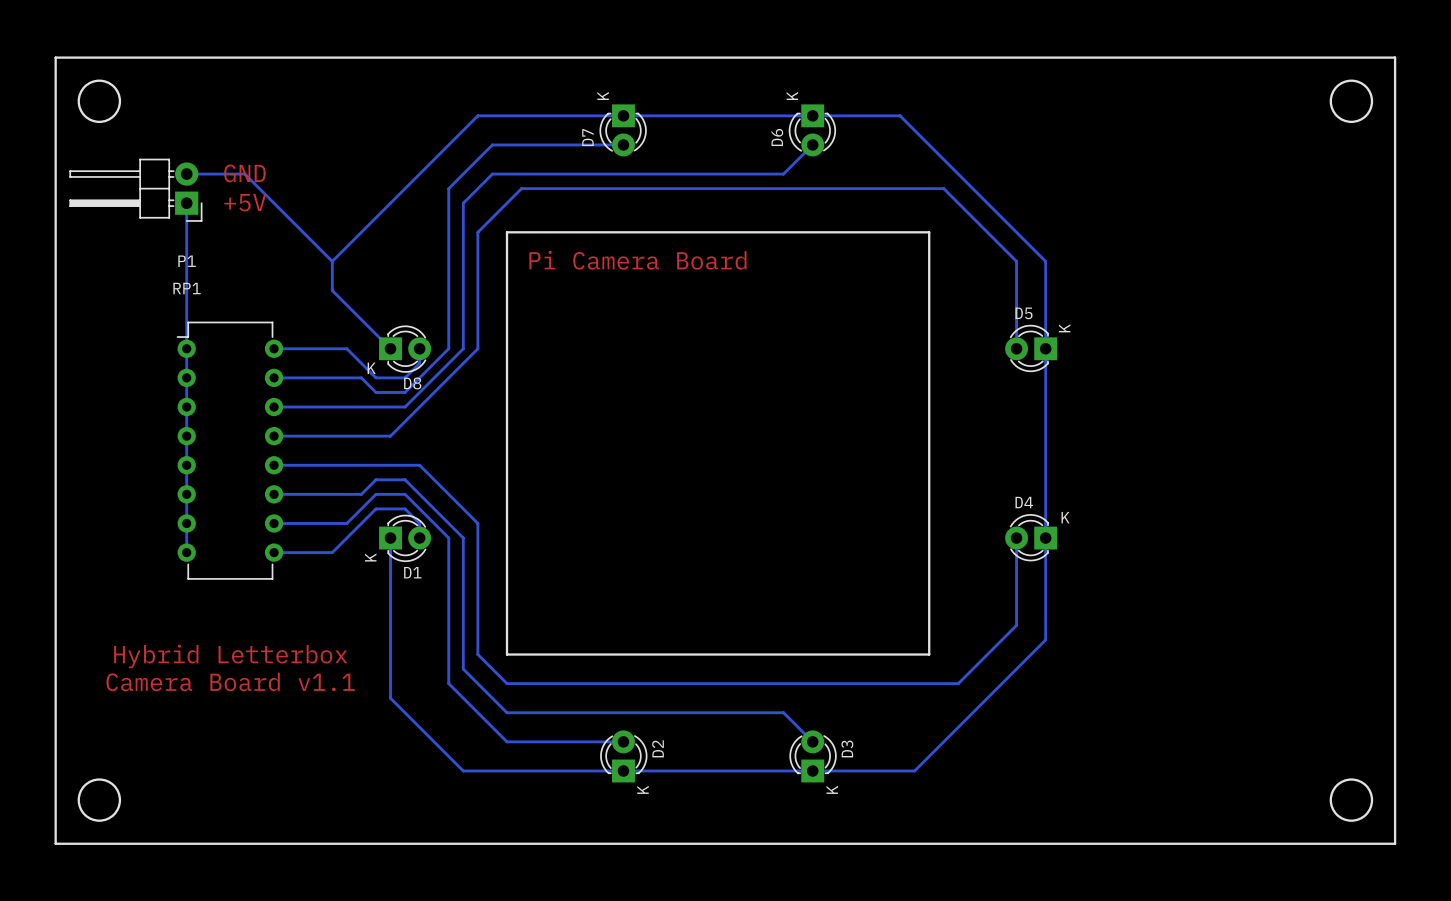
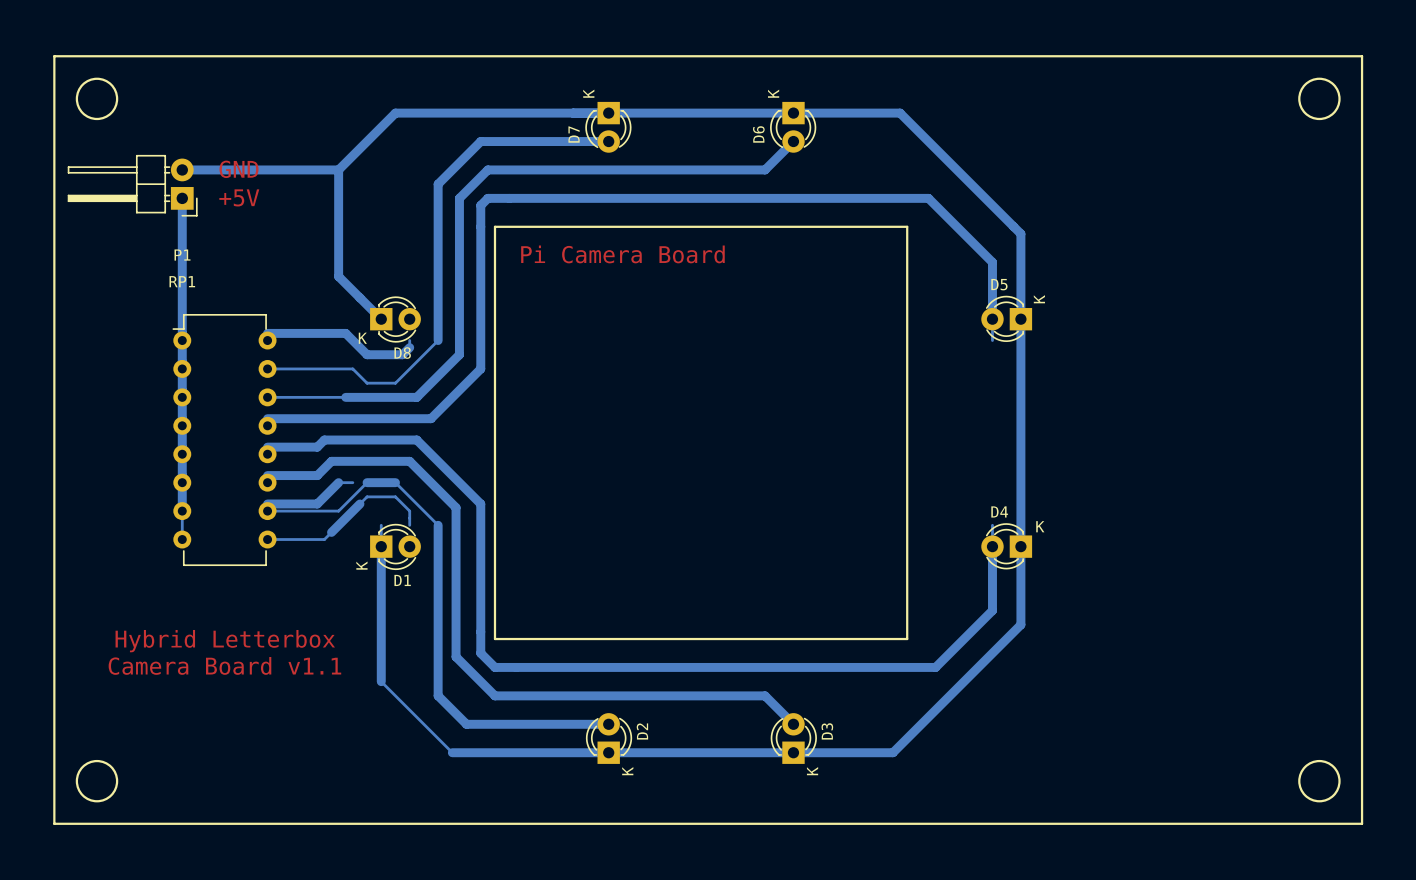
bottom track: (477, 115) (332, 261) -> (466, 113) (395, 113) (338, 169)
bottom track width: thin (477, 115) (900, 115) -> thick (466, 113) (878, 113)
bottom track: (900, 115) (1045, 261) -> (878, 113) (900, 113) (1020, 233) (1020, 255)
bottom track width: thin (623, 144) (492, 144) (448, 188) (448, 348) -> thick (608, 141) (480, 141) (438, 184) (438, 340)
bottom track width: thin (812, 144) (783, 174) (499, 174) -> thick (793, 141) (765, 169) (487, 169)
bottom track width: thin (186, 174) (244, 174) -> thick (182, 169) (239, 169)
bottom track: (244, 174) (332, 261) -> (239, 169) (338, 169)
bottom track: none -> (338, 169) (338, 276) (381, 319)
bottom track: (499, 174) (492, 174) (463, 203) (463, 348) (405, 407) -> (487, 169) (459, 198) (459, 354) (416, 397) (395, 397)
bottom track width: thin (186, 203) (186, 523) -> thick (182, 198) (182, 511)
bottom track: (332, 261) (332, 290) (390, 348) -> none
bottom track width: thin (1045, 261) (1045, 639) (914, 770) (463, 770) -> thick (1020, 255) (1020, 624) (892, 752) (452, 752)
bottom track: (1016, 268) (1016, 261) (943, 188) (521, 188) (477, 232) (477, 348) (390, 436) (274, 436) -> (992, 262) (928, 198) (487, 198) (480, 205) (480, 368) (431, 418) (267, 418)
bottom track width: thin (1016, 268) (1016, 326) -> thick (992, 262) (992, 319)
bottom track: (274, 348) (346, 348) (375, 377) (405, 377) (419, 363) (419, 356) -> (267, 333) (345, 333) (367, 354) (402, 354) (409, 347)
D5 position: (1031, 348) -> (1006, 318)
D8 position: (405, 349) -> (395, 319)
bottom track width: thin (354, 407) (405, 407) -> thick (345, 397) (395, 397)
bottom track: (274, 465) (419, 465) (477, 523) (477, 654) (492, 669) -> (267, 447) (317, 447) (324, 440) (416, 440) (480, 503) (480, 653)
bottom track: (274, 494) (346, 494) -> (267, 503) (317, 503) (338, 482)
bottom track: (361, 494) (375, 479) (405, 479) (463, 538) (463, 669) (467, 672) -> (267, 475) (317, 475) (331, 461) (409, 461) (456, 507) (456, 656)
bottom track width: thin (375, 494) (405, 494) -> thick (367, 482) (395, 482)
bottom track width: thin (368, 516) (339, 545) -> thick (359, 503) (331, 532)
D4 position: (1031, 537) -> (1006, 546)
D1 position: (405, 538) -> (395, 546)
bottom track width: thin (448, 538) (448, 683) -> thick (438, 525) (438, 667)
bottom track width: thin (390, 559) (390, 698) -> thick (381, 546) (381, 681)
bottom track width: thin (1016, 559) (1016, 625) (958, 683) (507, 683) (492, 669) -> thick (992, 546) (992, 610) (935, 667) (494, 667) (480, 653)
bottom track width: thin (467, 672) (507, 712) (783, 712) (812, 741) -> thick (456, 656) (494, 695) (765, 695) (793, 724)
bottom track: (448, 683) (507, 741) -> (438, 667) (438, 695) (466, 724) (494, 724)
bottom track width: thin (507, 741) (623, 741) -> thick (494, 724) (608, 724)

